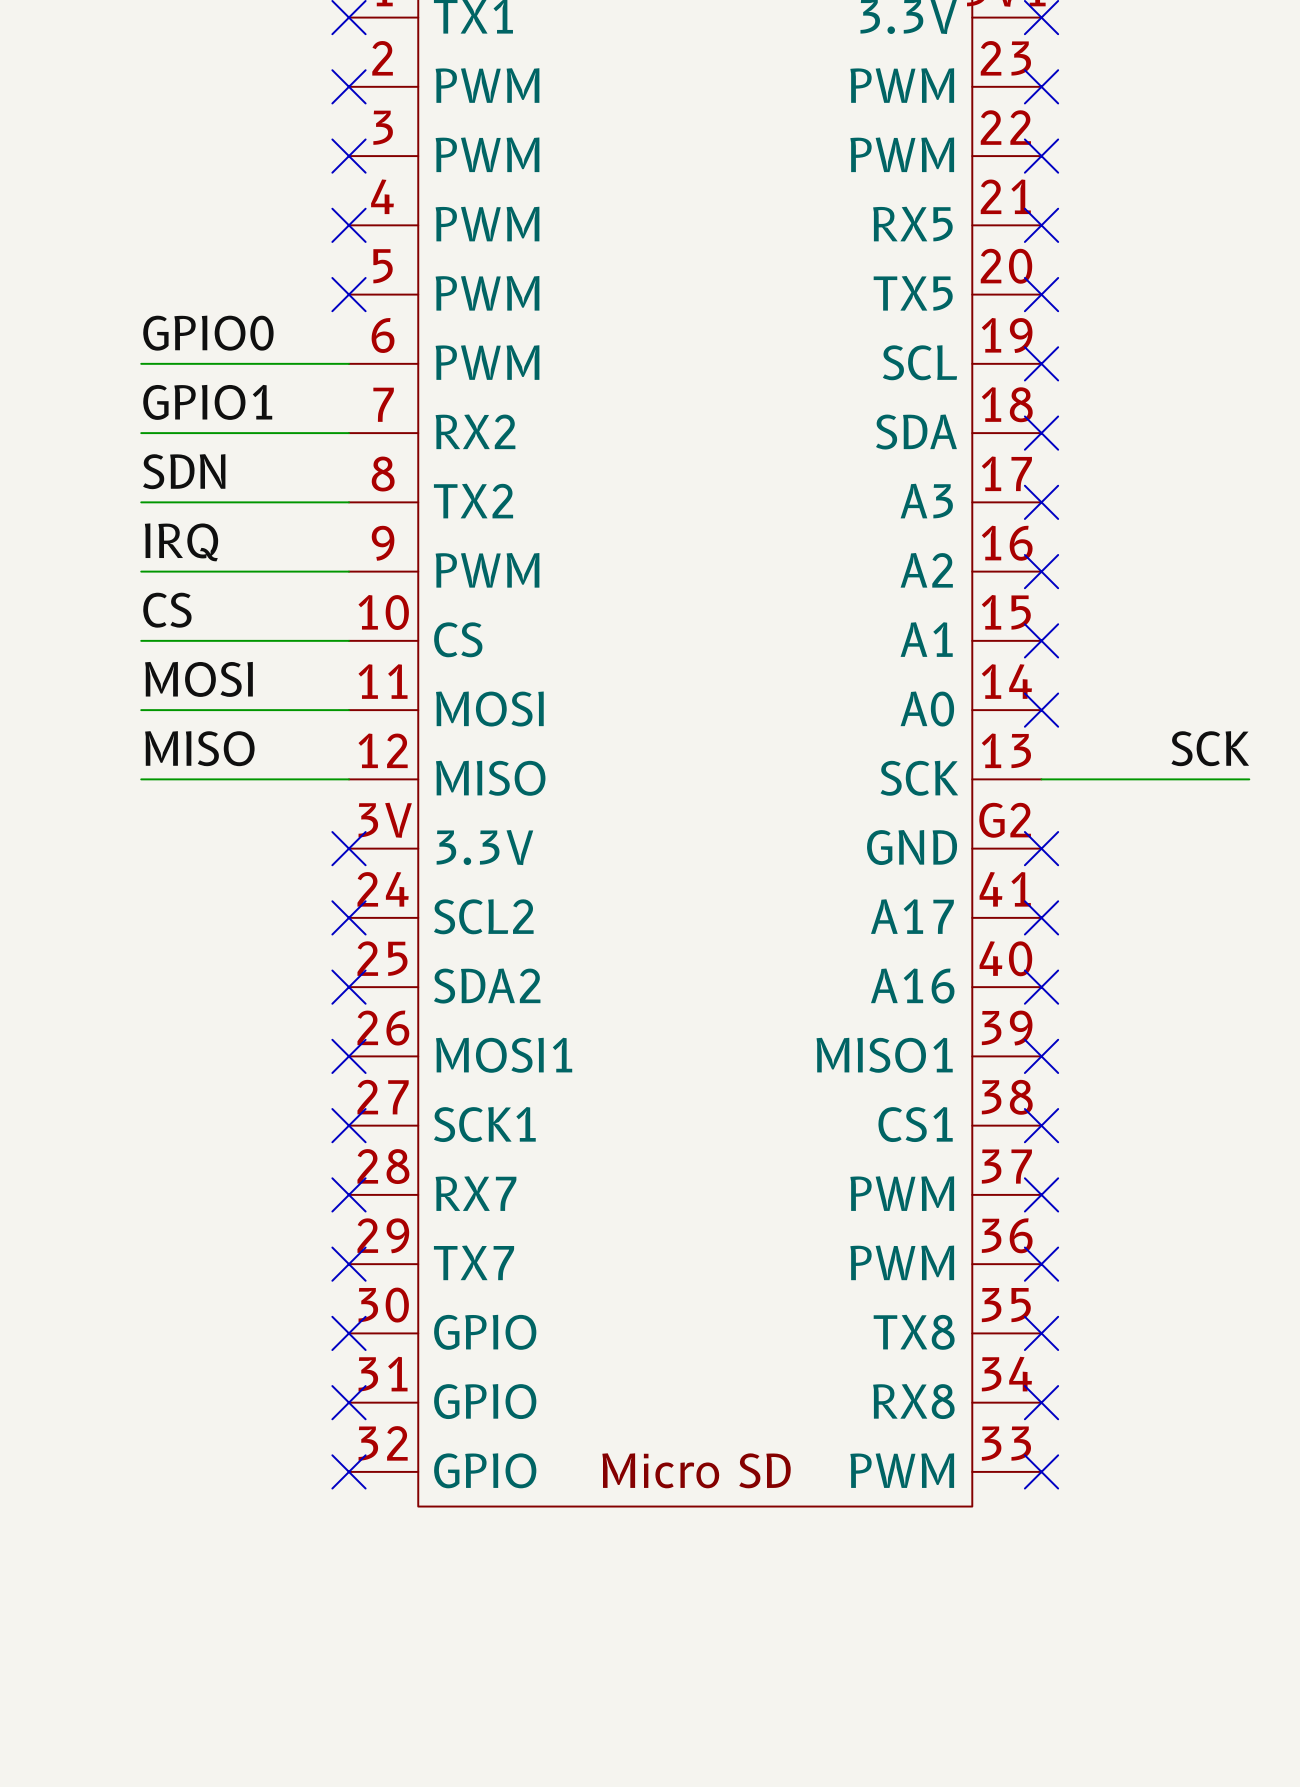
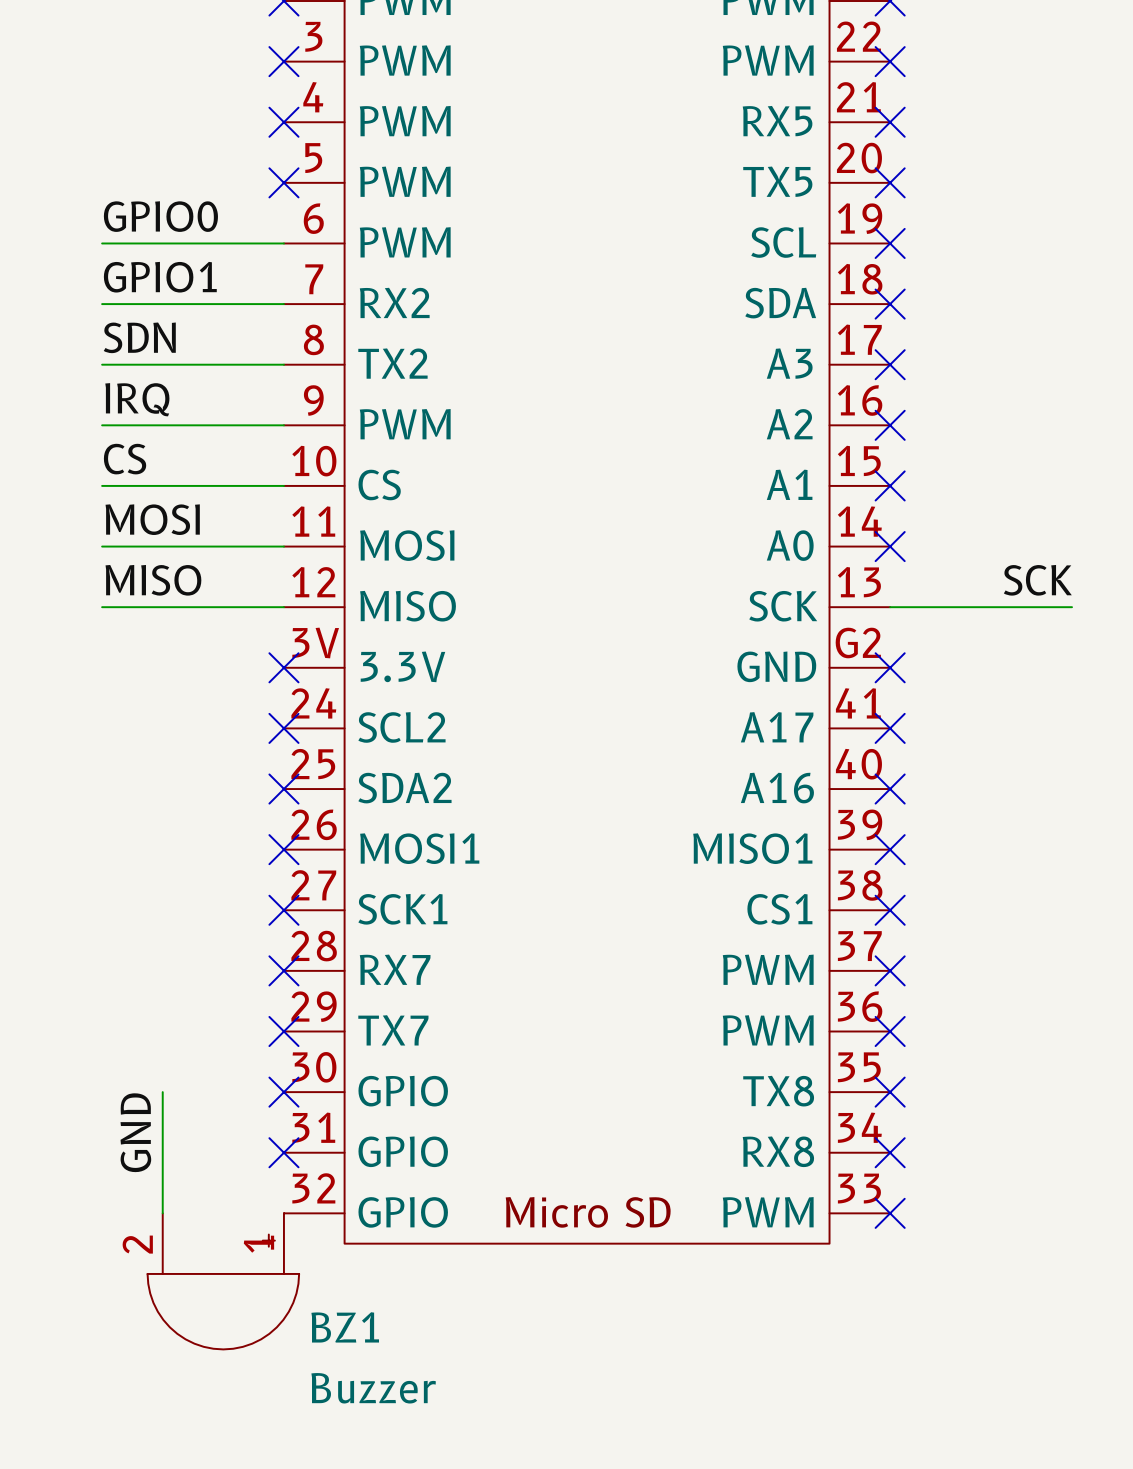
wire: none -> (162, 1092) (162, 1213)
label: none -> GND (135, 1132)
no-connect mark: (348, 1471) -> none
BZ1: none -> Buzzer (223, 1281)

